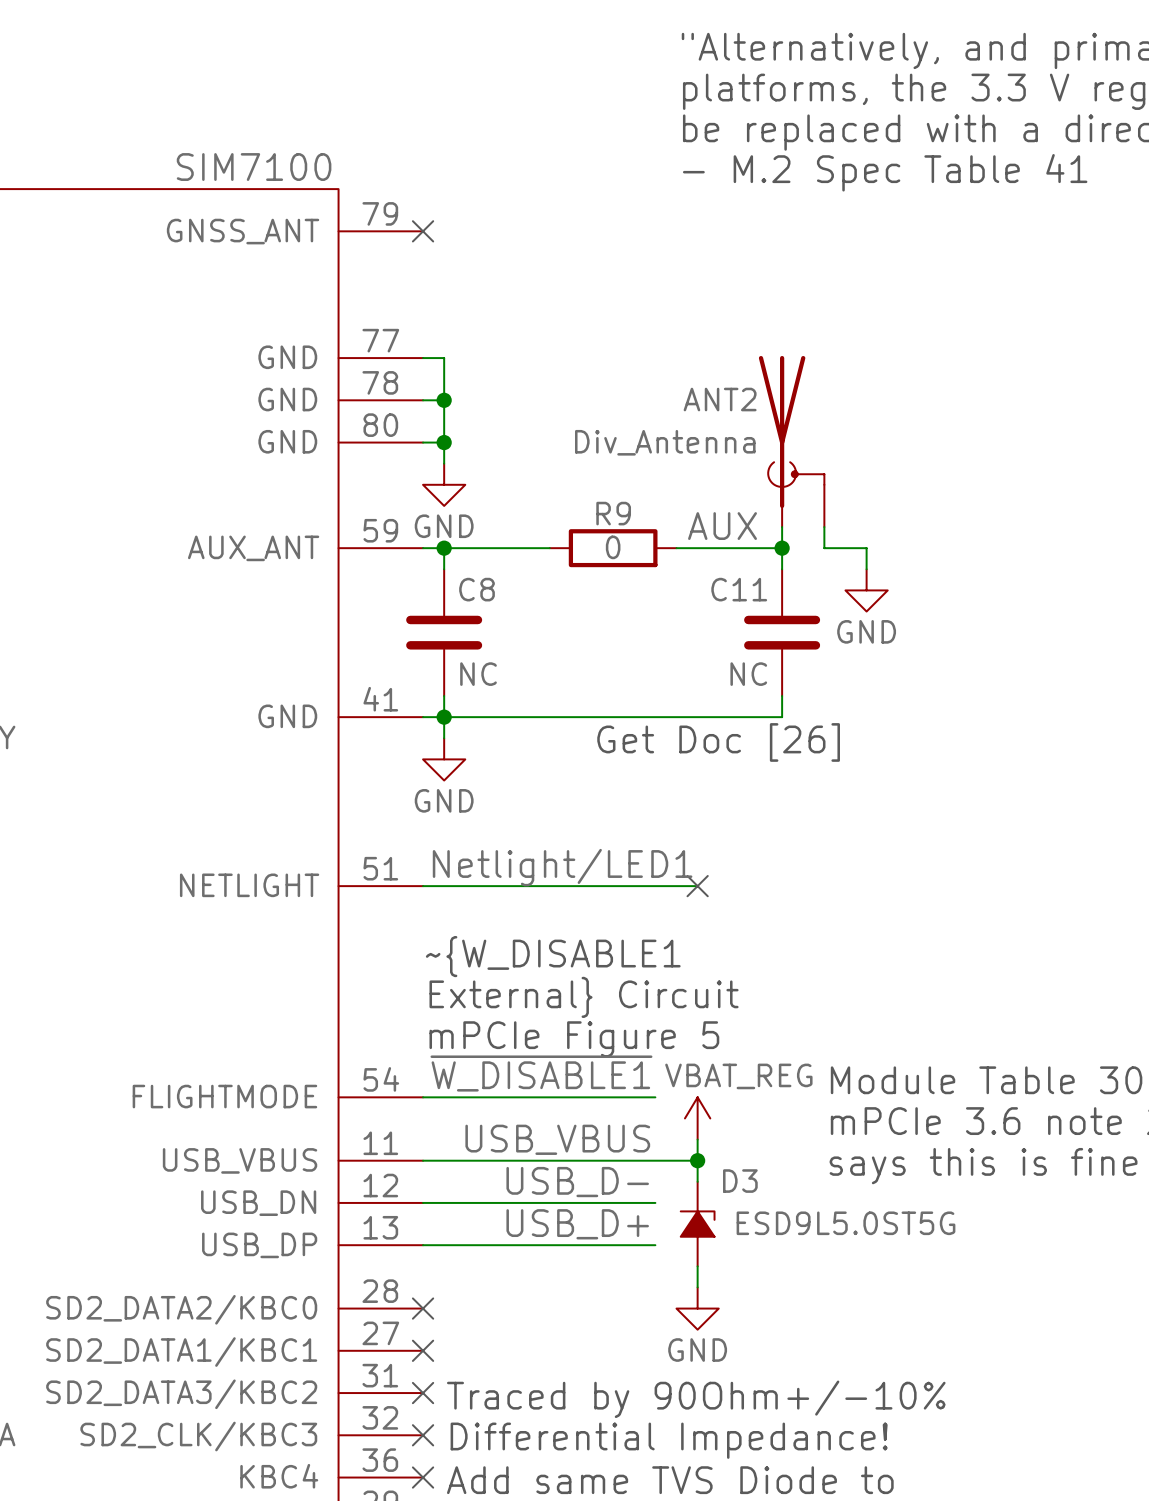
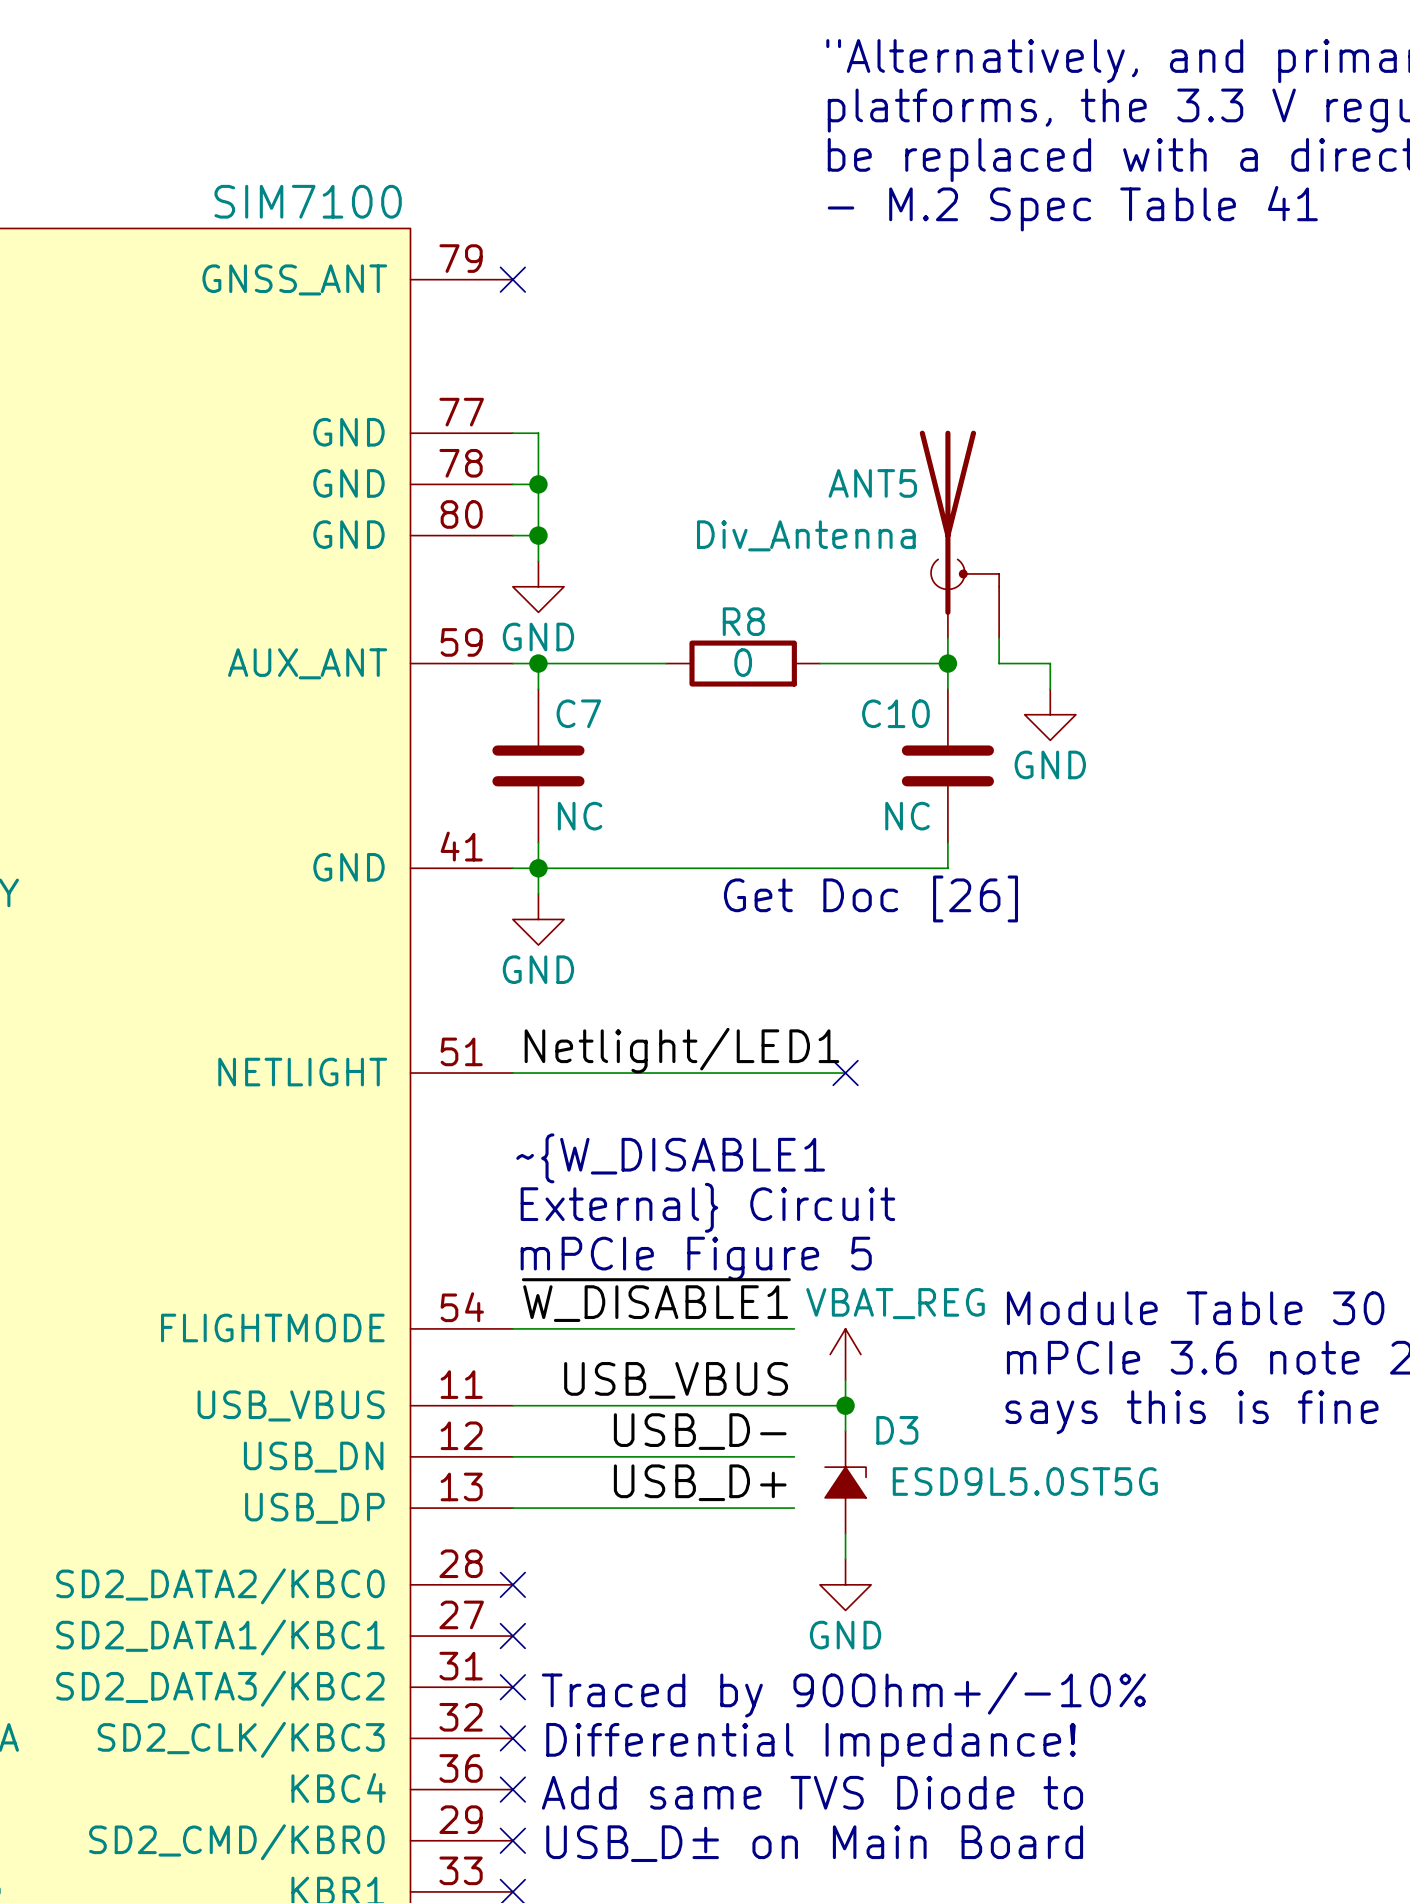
ANT2 name: ANT2 (720, 399) -> ANT5 (872, 483)
R9 name: R9 (613, 513) -> R8 (743, 621)
label: AUX (722, 526) -> none
C8 name: C8 (477, 589) -> C7 (578, 713)
C11 name: C11 (739, 589) -> C10 (895, 713)

